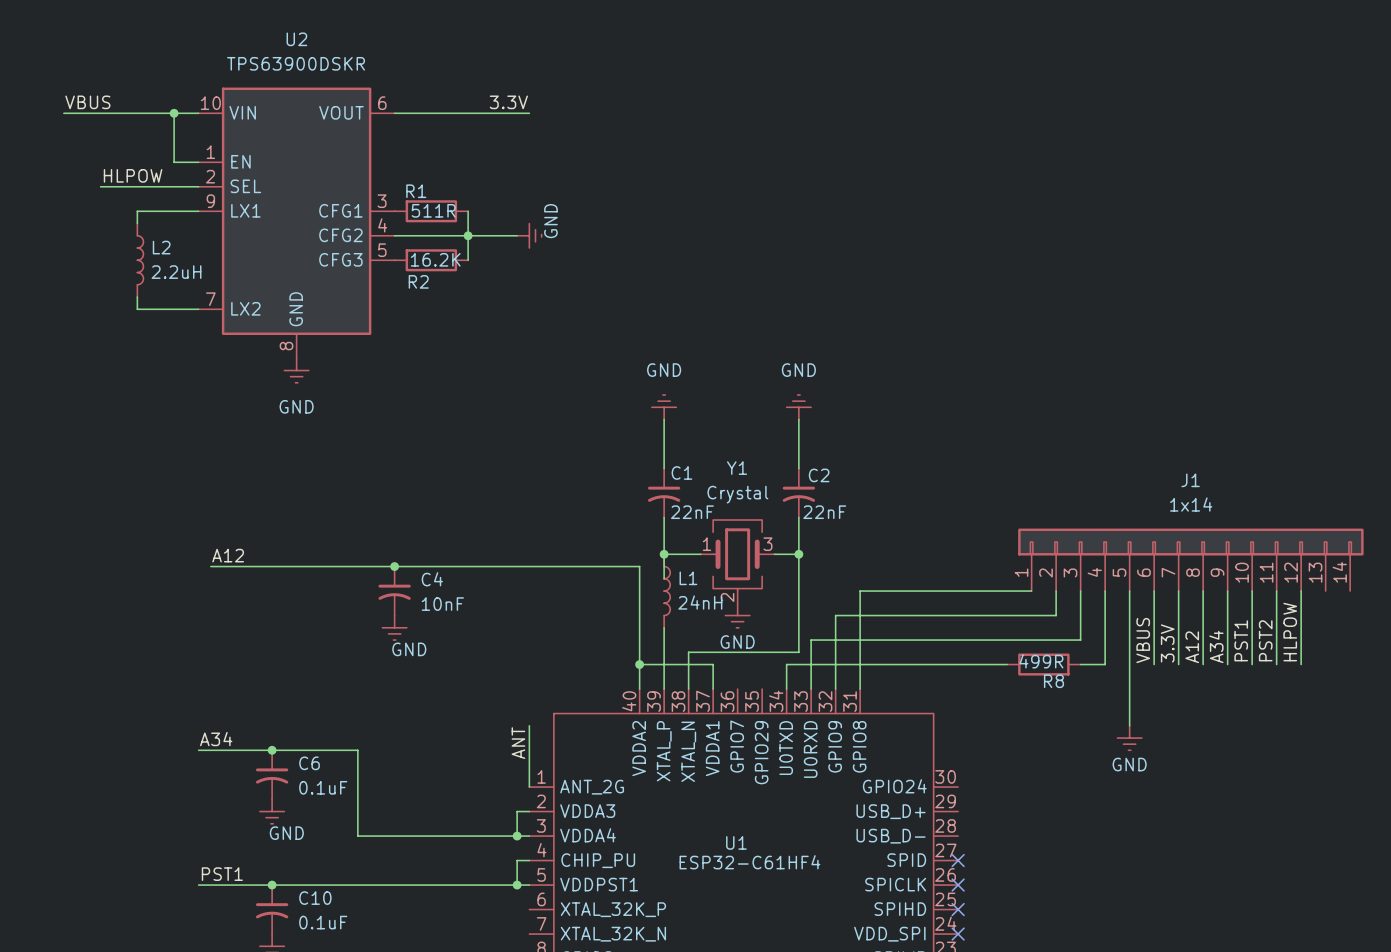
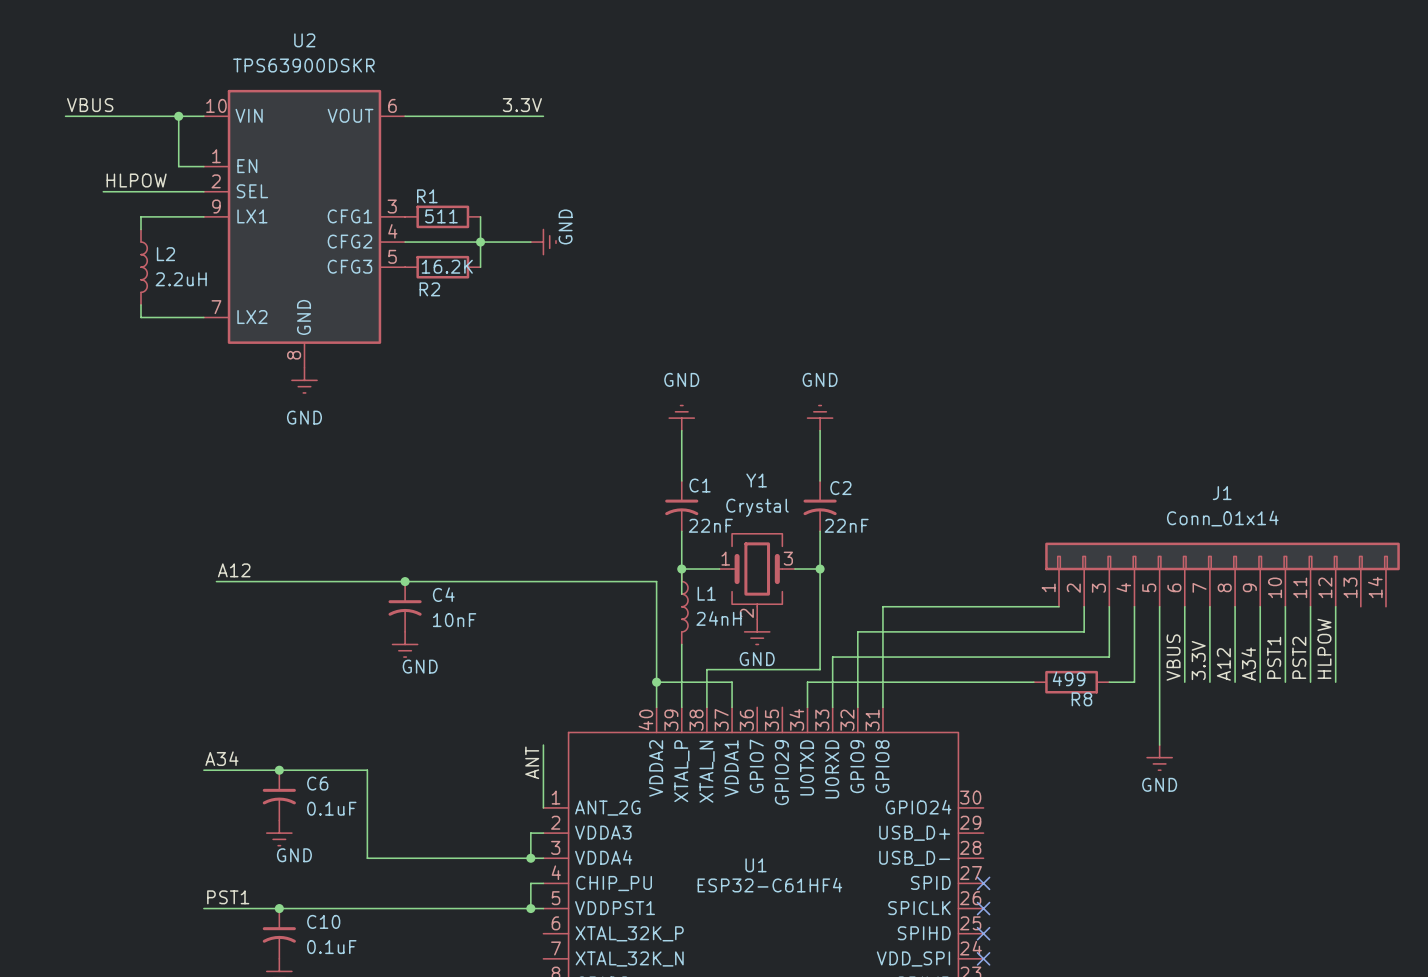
R1 value: 511R (433, 210) -> 511 (441, 216)
J1 value: 1x14 (1191, 504) -> Conn_01x14 (1222, 518)
R8 value: 499R (1041, 661) -> 499 (1069, 678)

